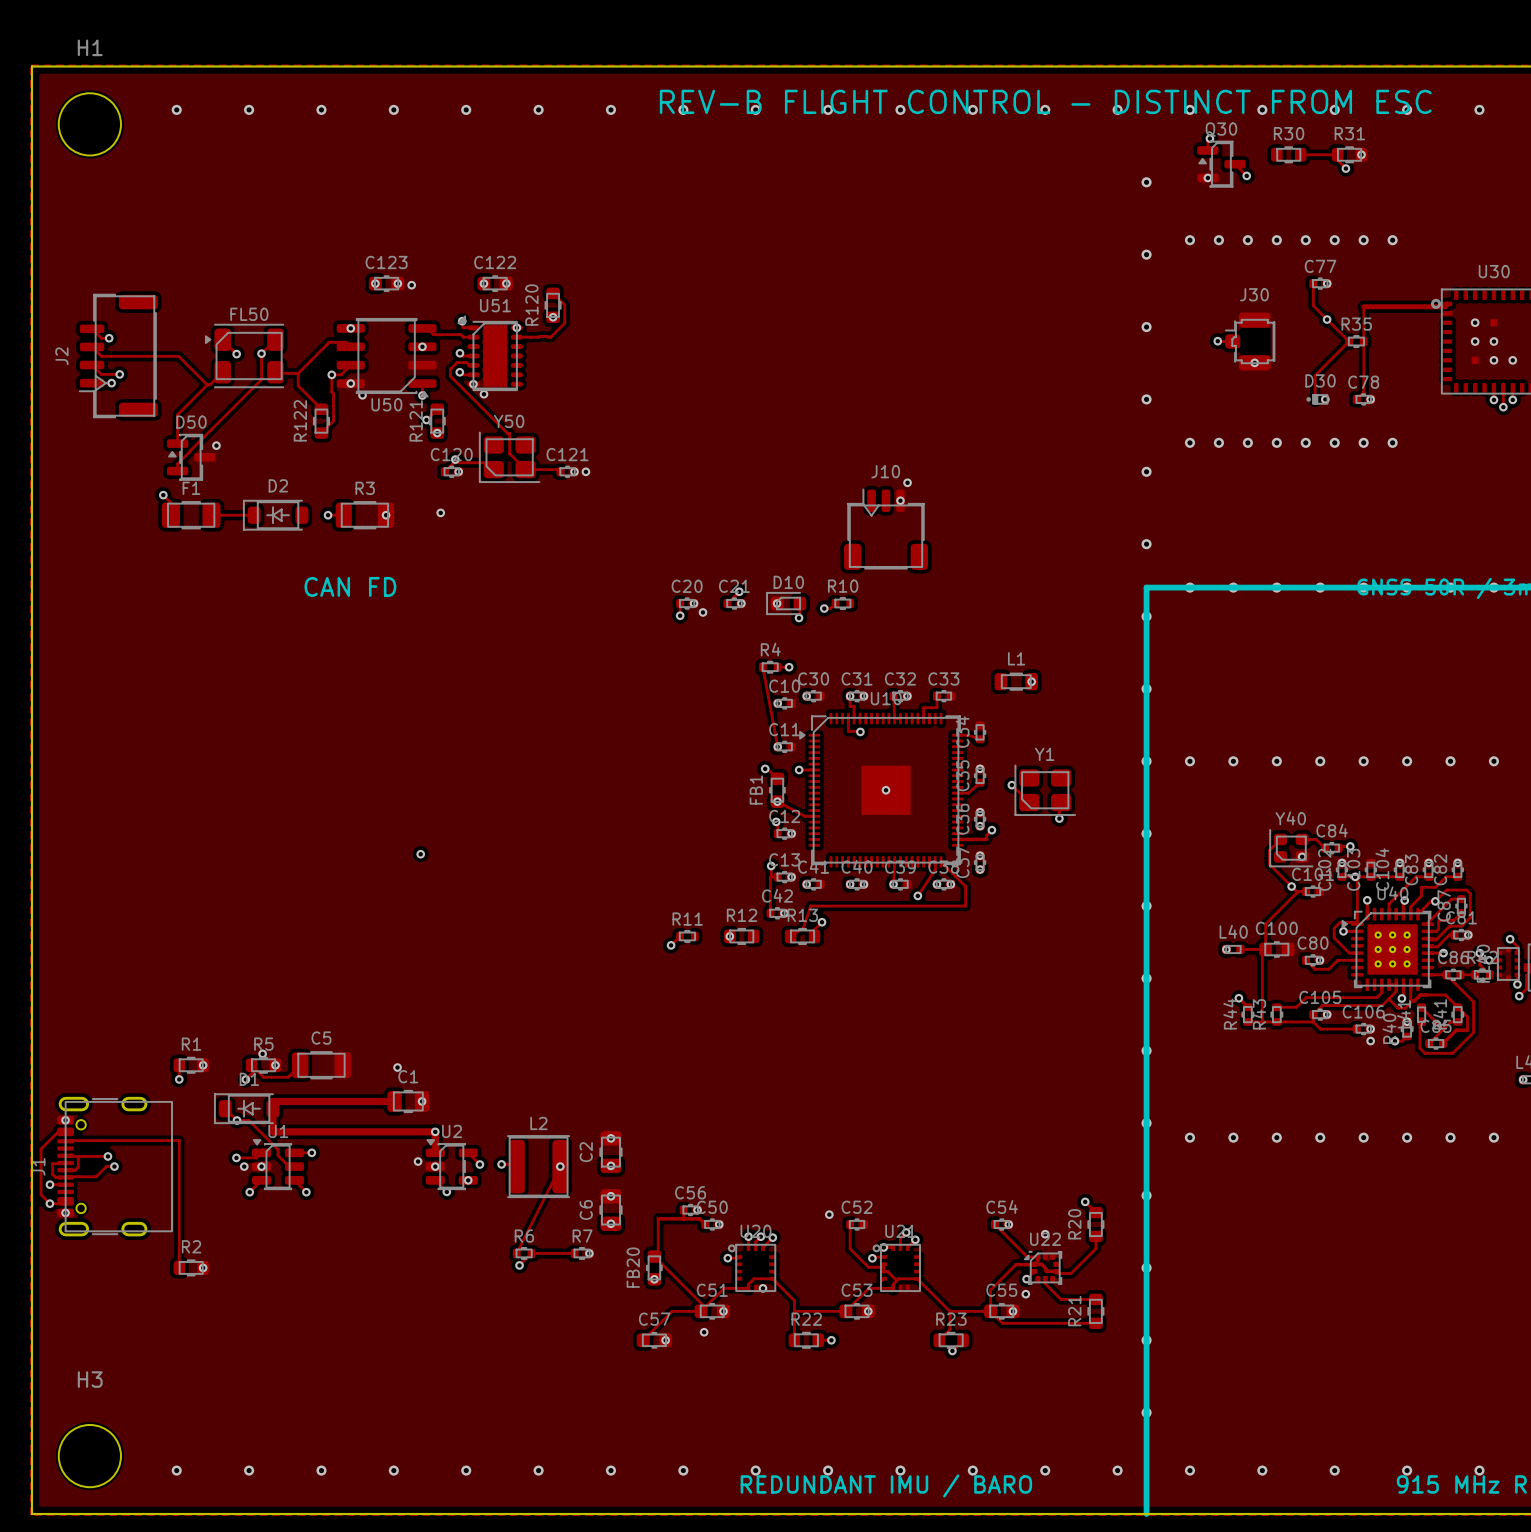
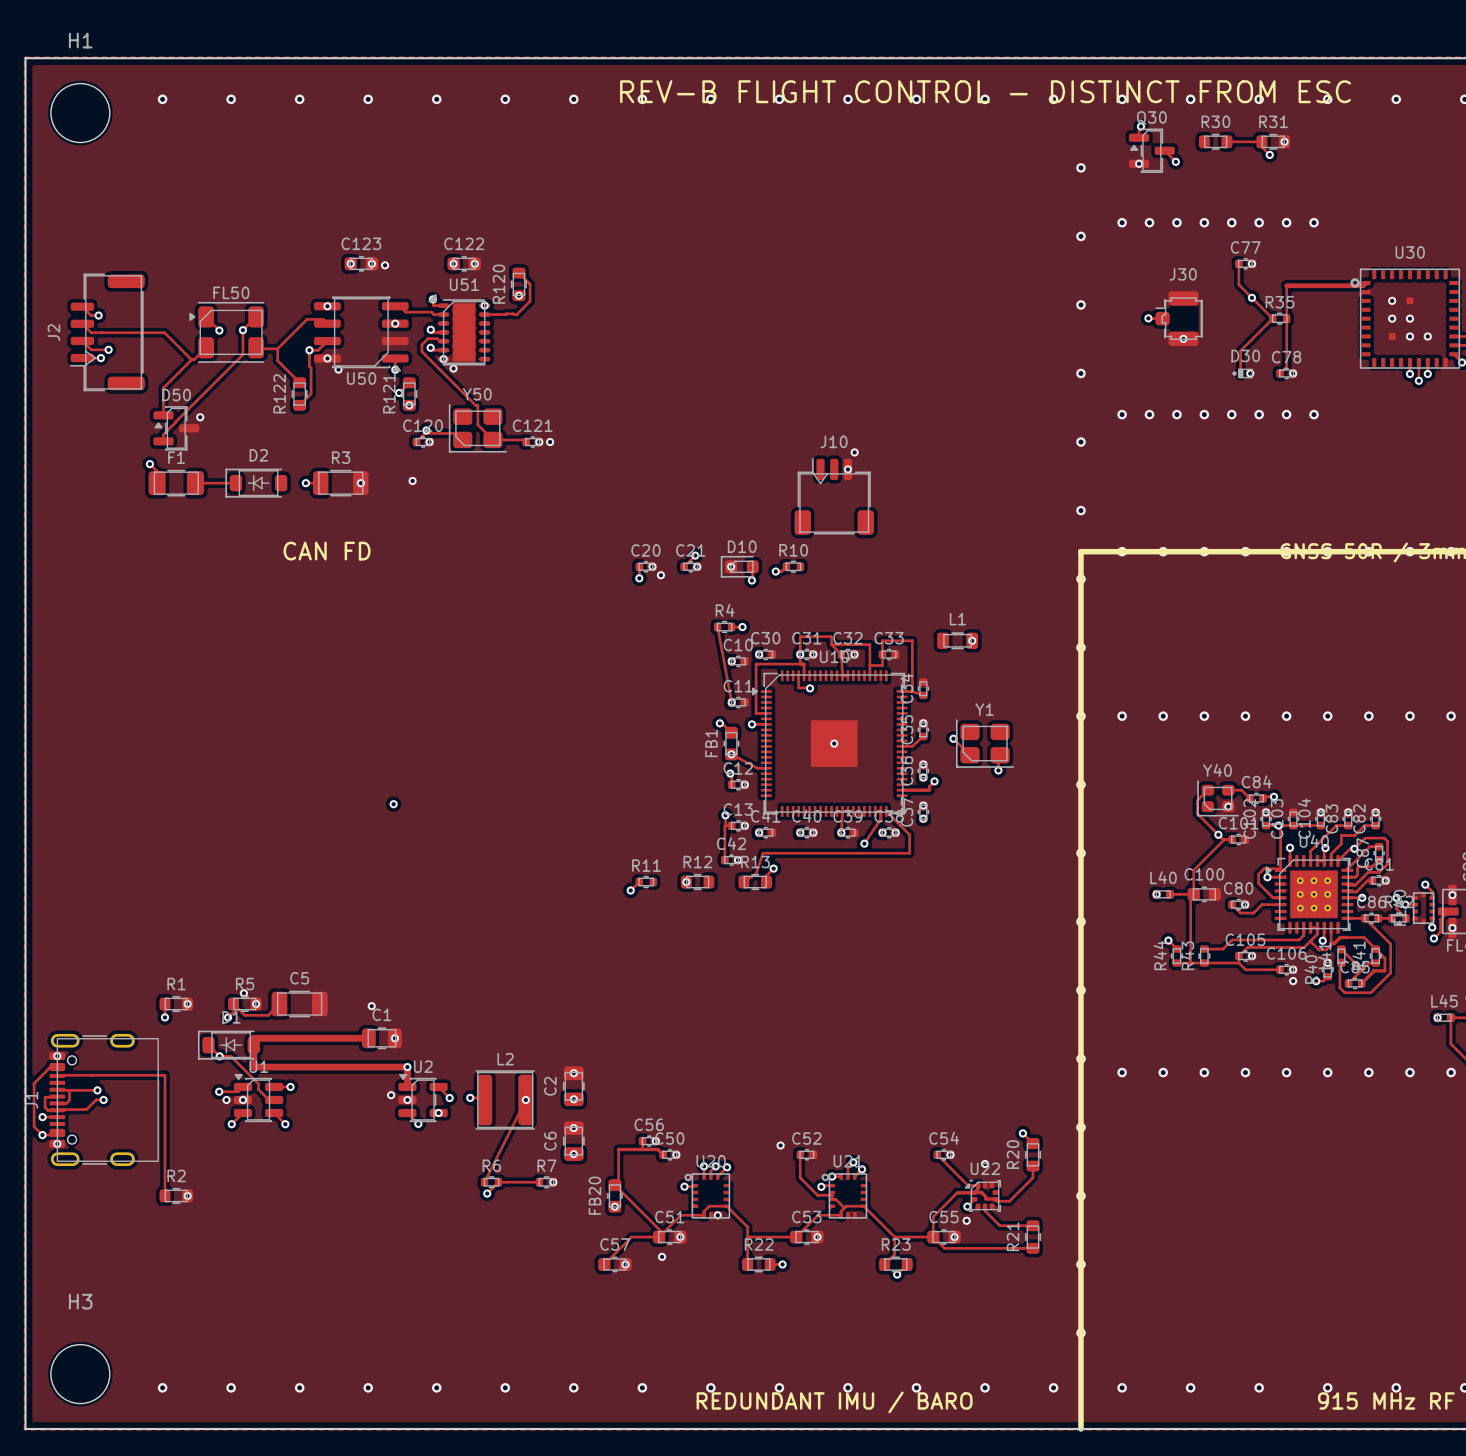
track: none -> (831, 644) (841, 654)
track: none -> (831, 644) (869, 644) (869, 665)
track: none -> (831, 644) (831, 636) (800, 636) (800, 654)
track: none -> (882, 654) (882, 640) (912, 640) (912, 691)
track: none -> (800, 664) (756, 664) (756, 713) (766, 713)

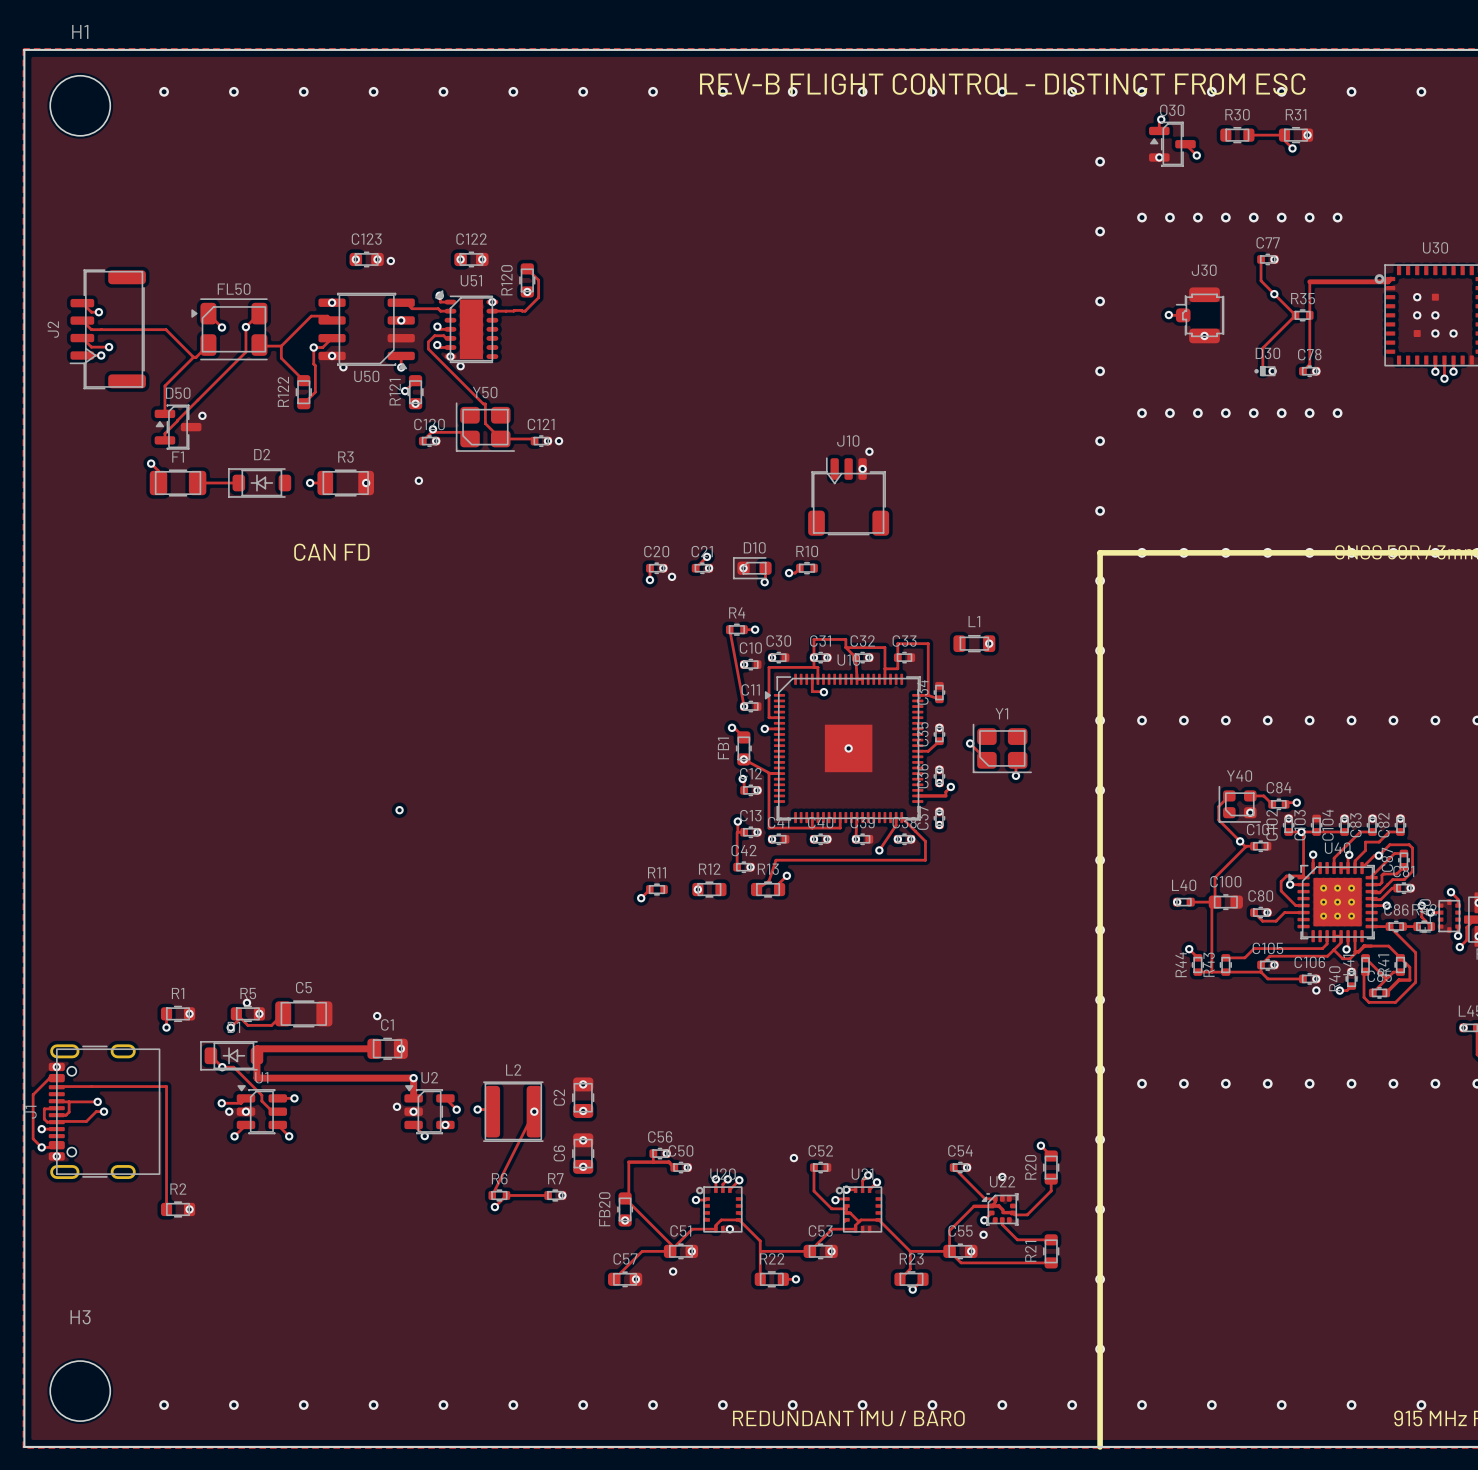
track: none -> (770, 773) (769, 828) (840, 828) (840, 817)
track: none -> (812, 817) (812, 828)

